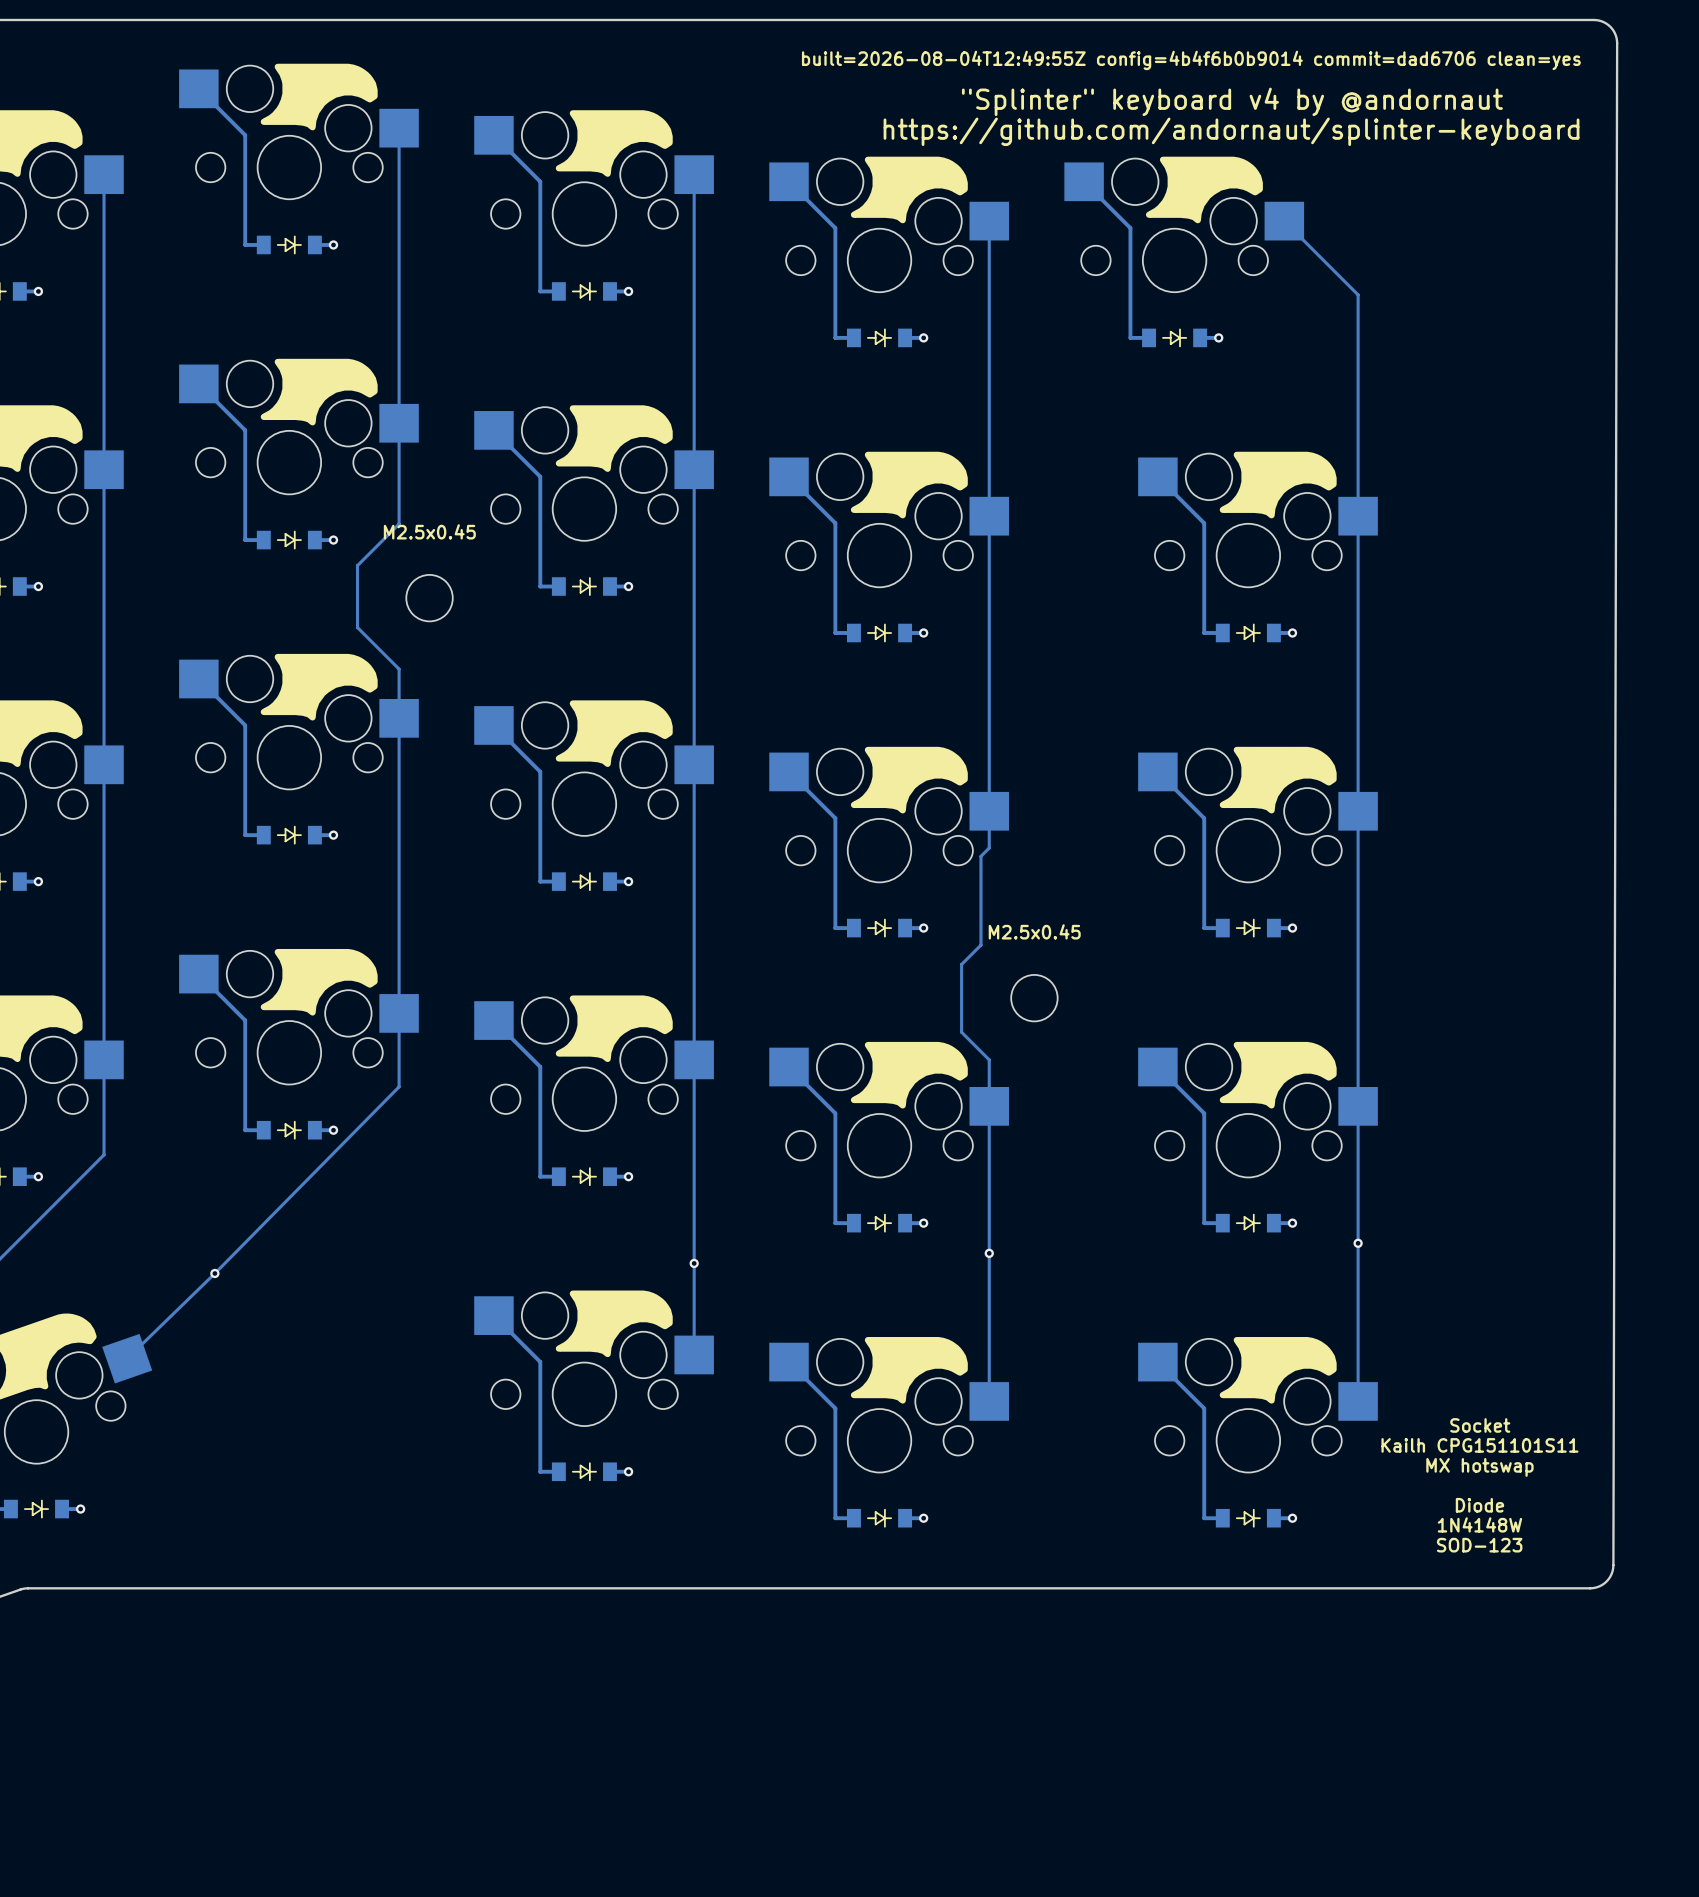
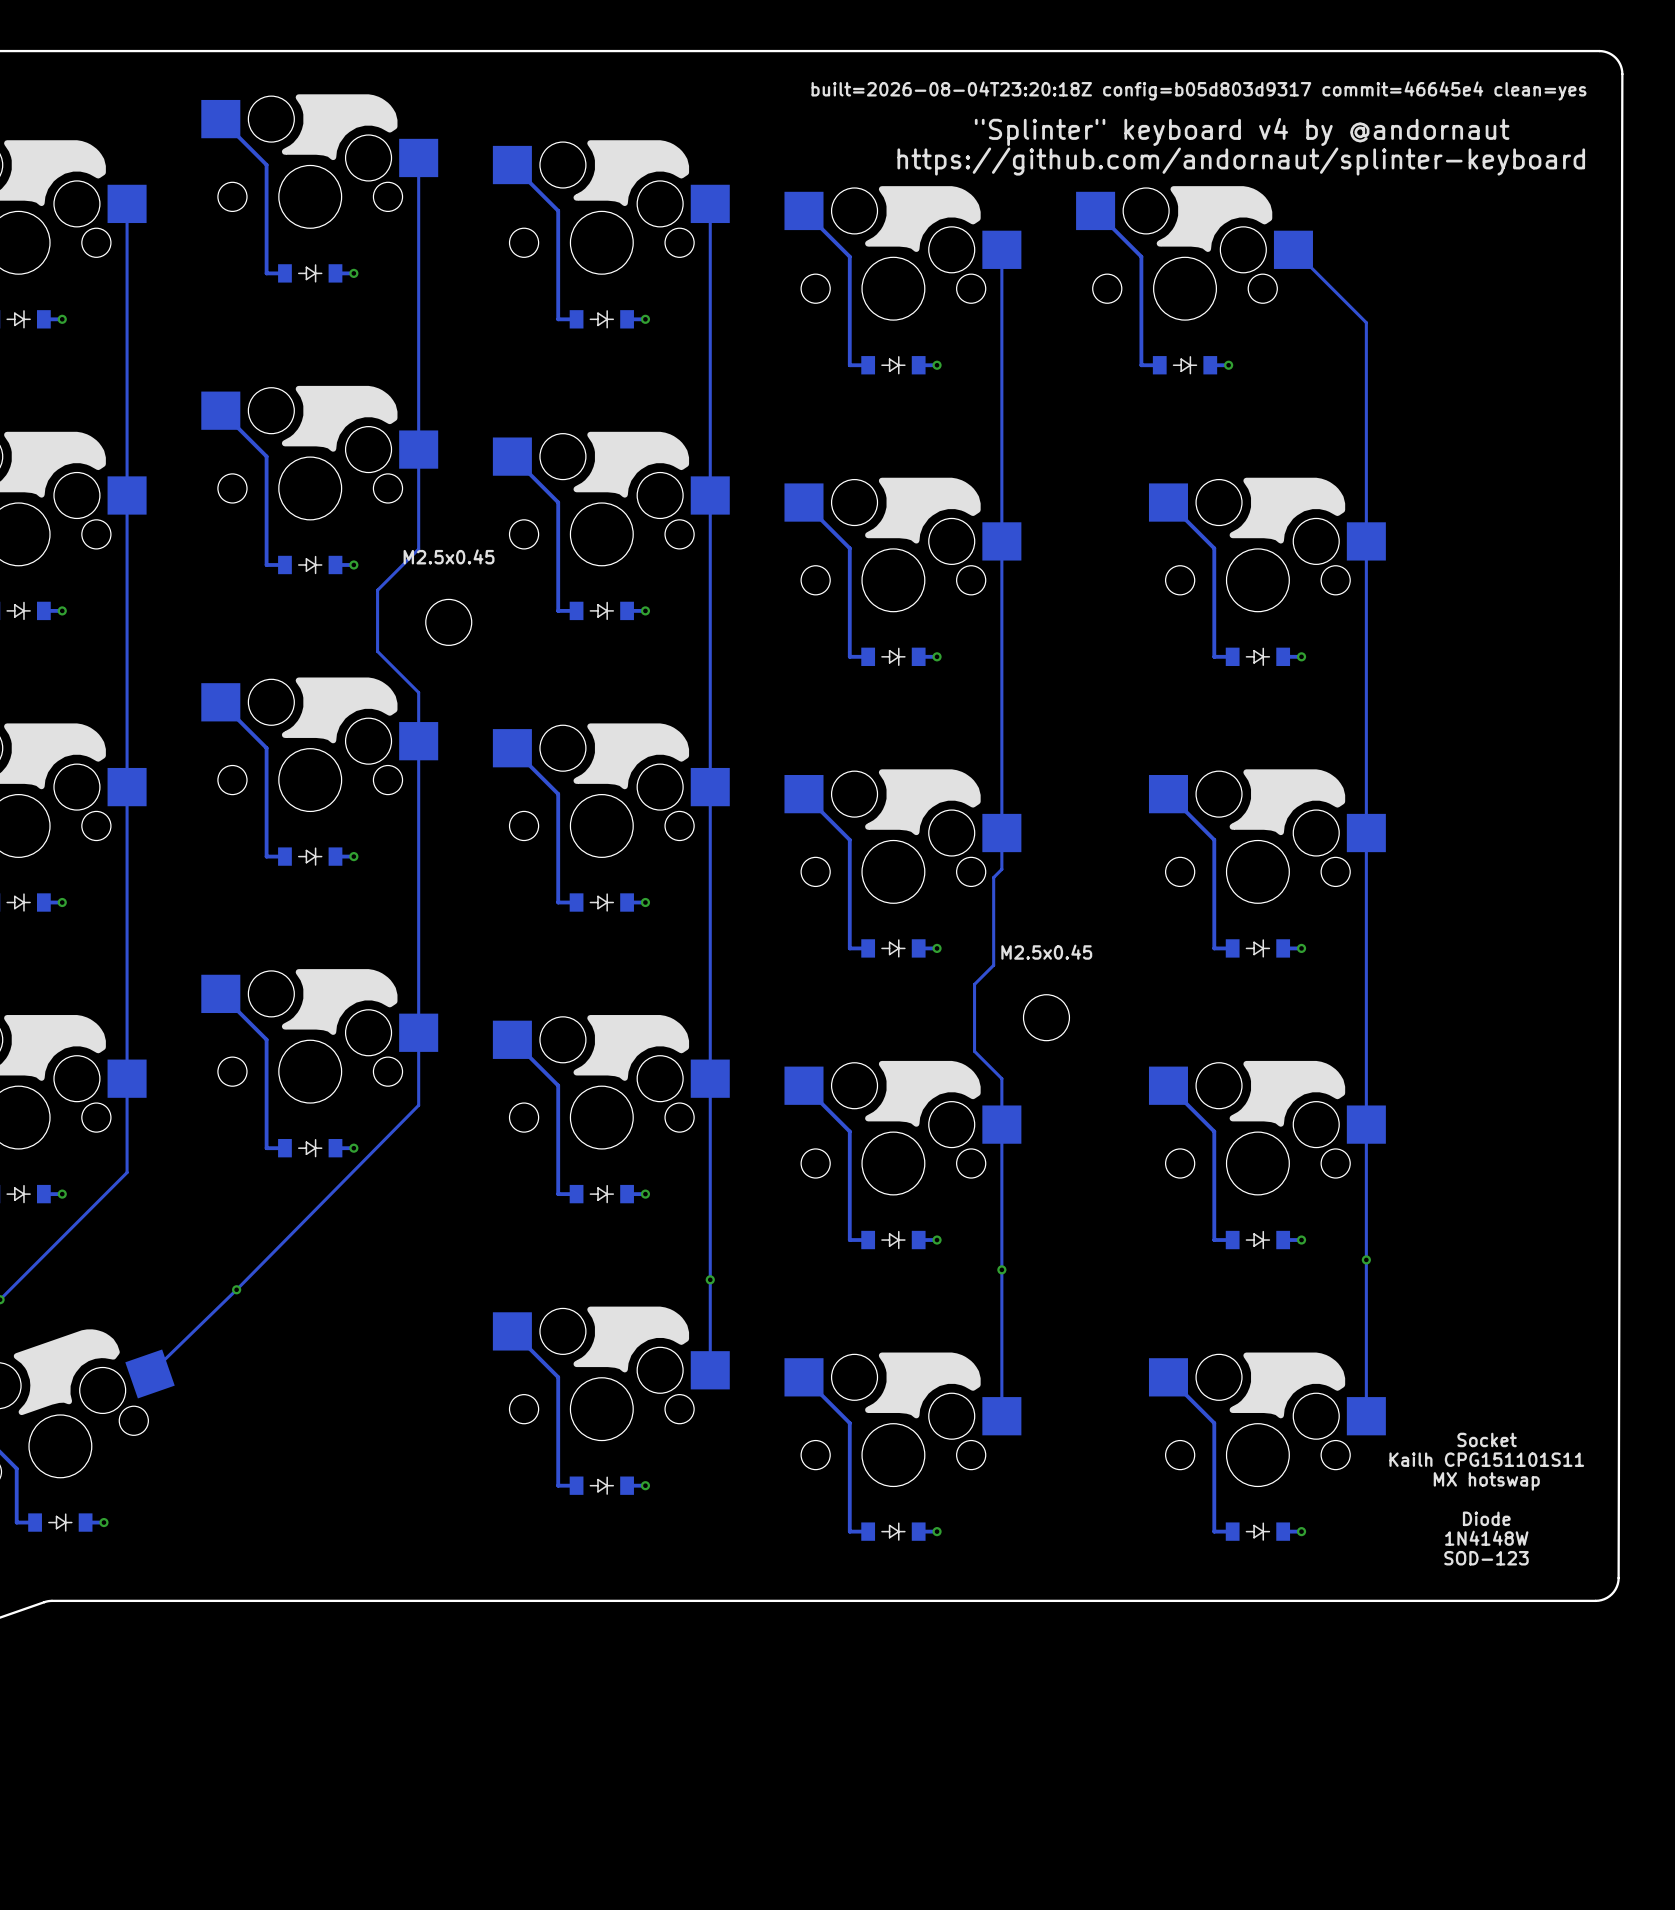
text: built=2026-08-04T12:49:55Z config=4b4f6b0b9014 commit=dad6706 clean=yes (1191, 60) -> built=2026-08-04T23:20:18Z config=b05d803d9317 commit=46645e4 clean=yes (1199, 91)

